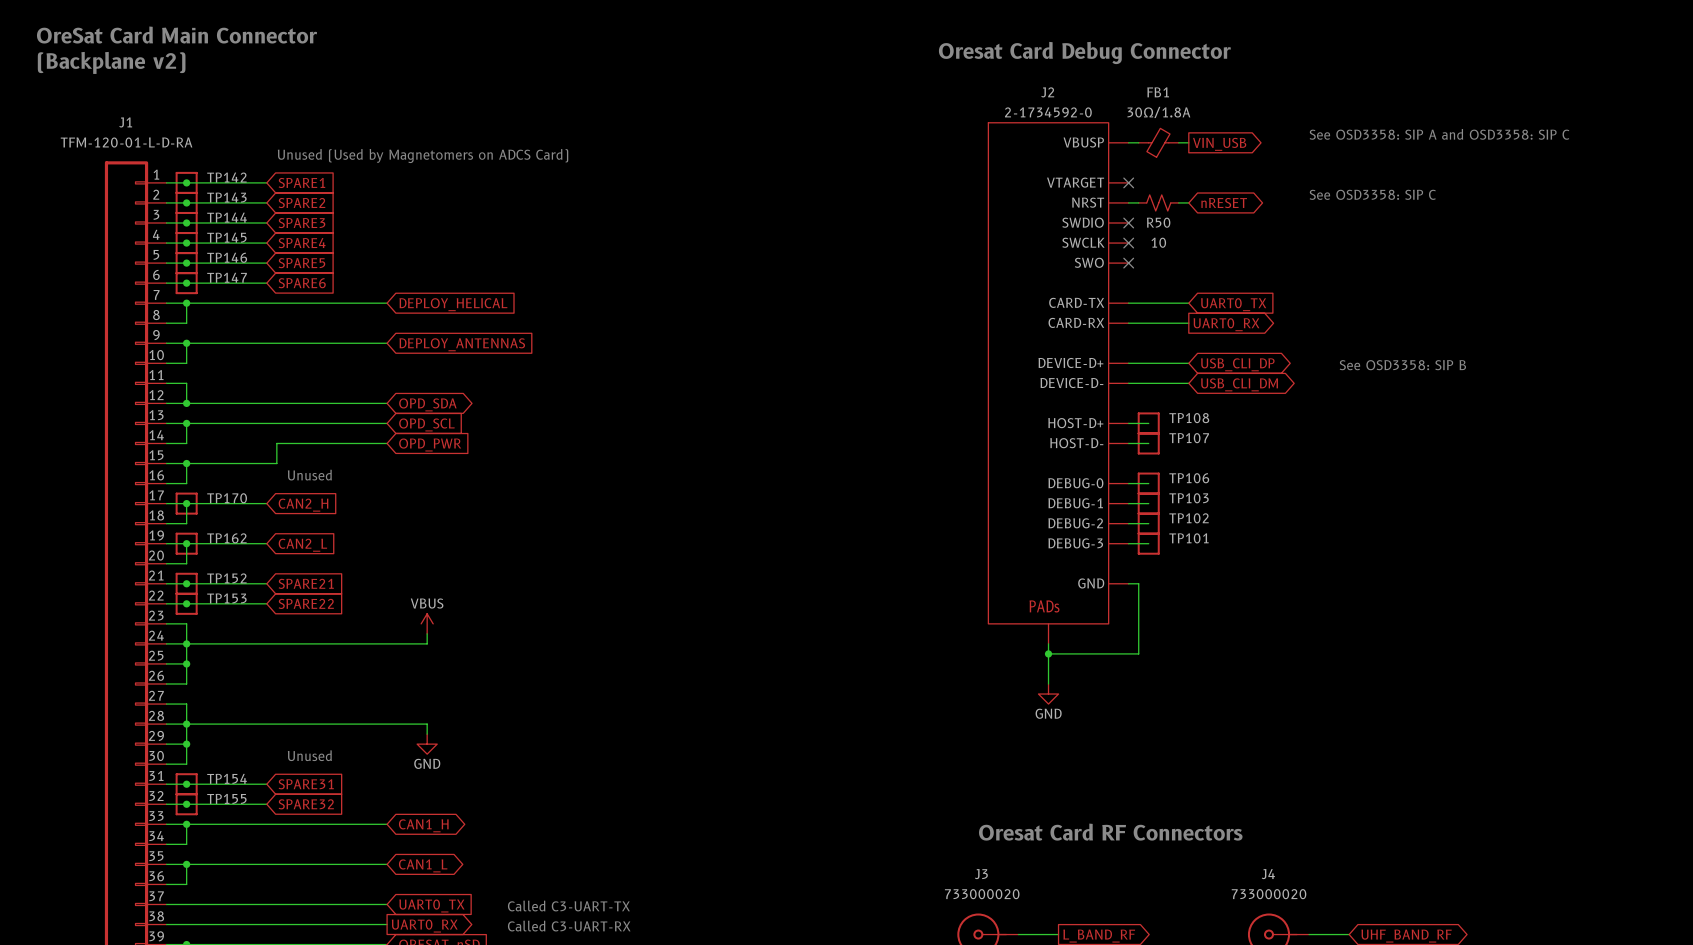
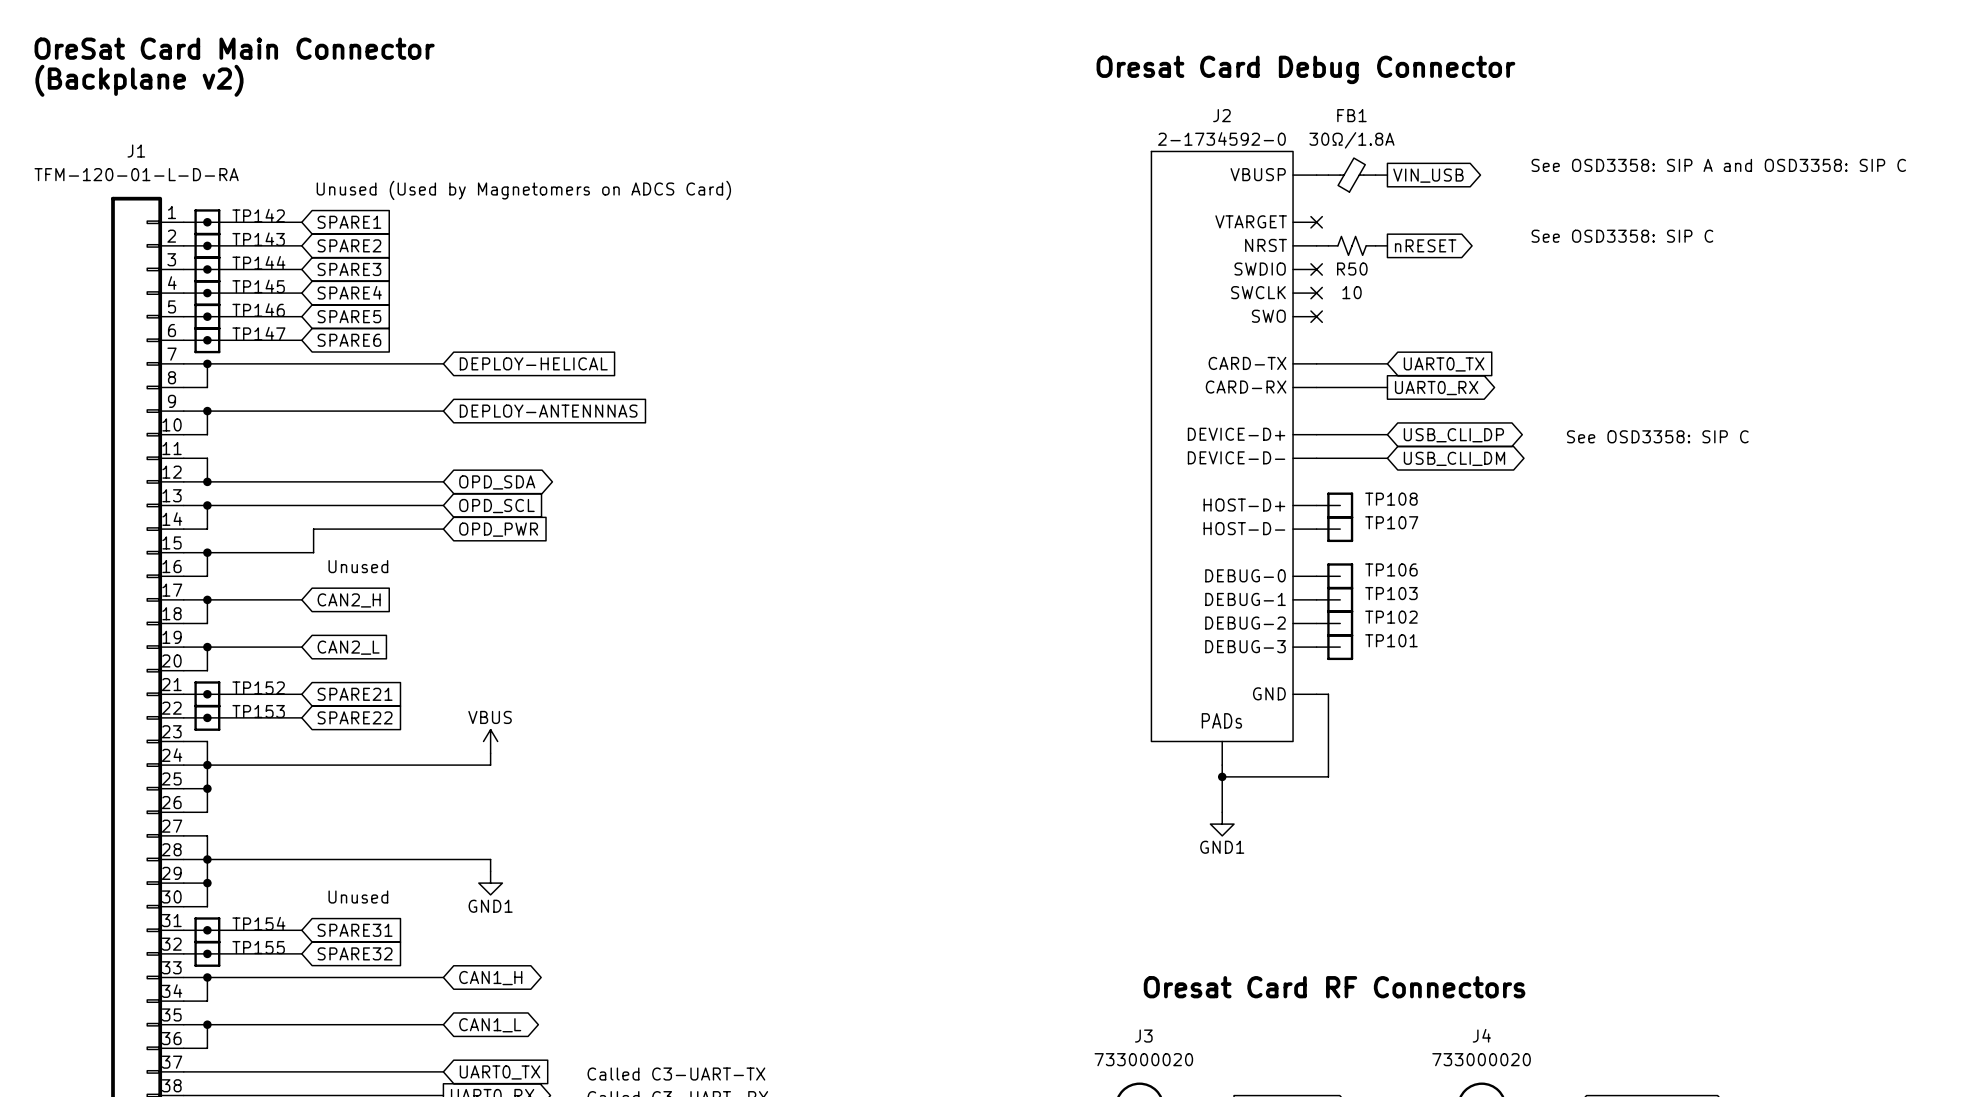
global label shape: bidirectional (1224, 203) -> output (1425, 245)
global label: DEPLOY_HELICAL (453, 304) -> DEPLOY-HELICAL (533, 363)
global label: DEPLOY_ANTENNAS (462, 344) -> DEPLOY-ANTENNNAS (548, 411)
text: See OSD3358: SIP B (1402, 365) -> See OSD3358: SIP C (1657, 436)
TP170: (186, 503) -> none
TP162: (186, 543) -> none
power symbol: GND (1048, 694) -> GND1 (1222, 824)
power symbol: GND (427, 744) -> GND1 (490, 883)

